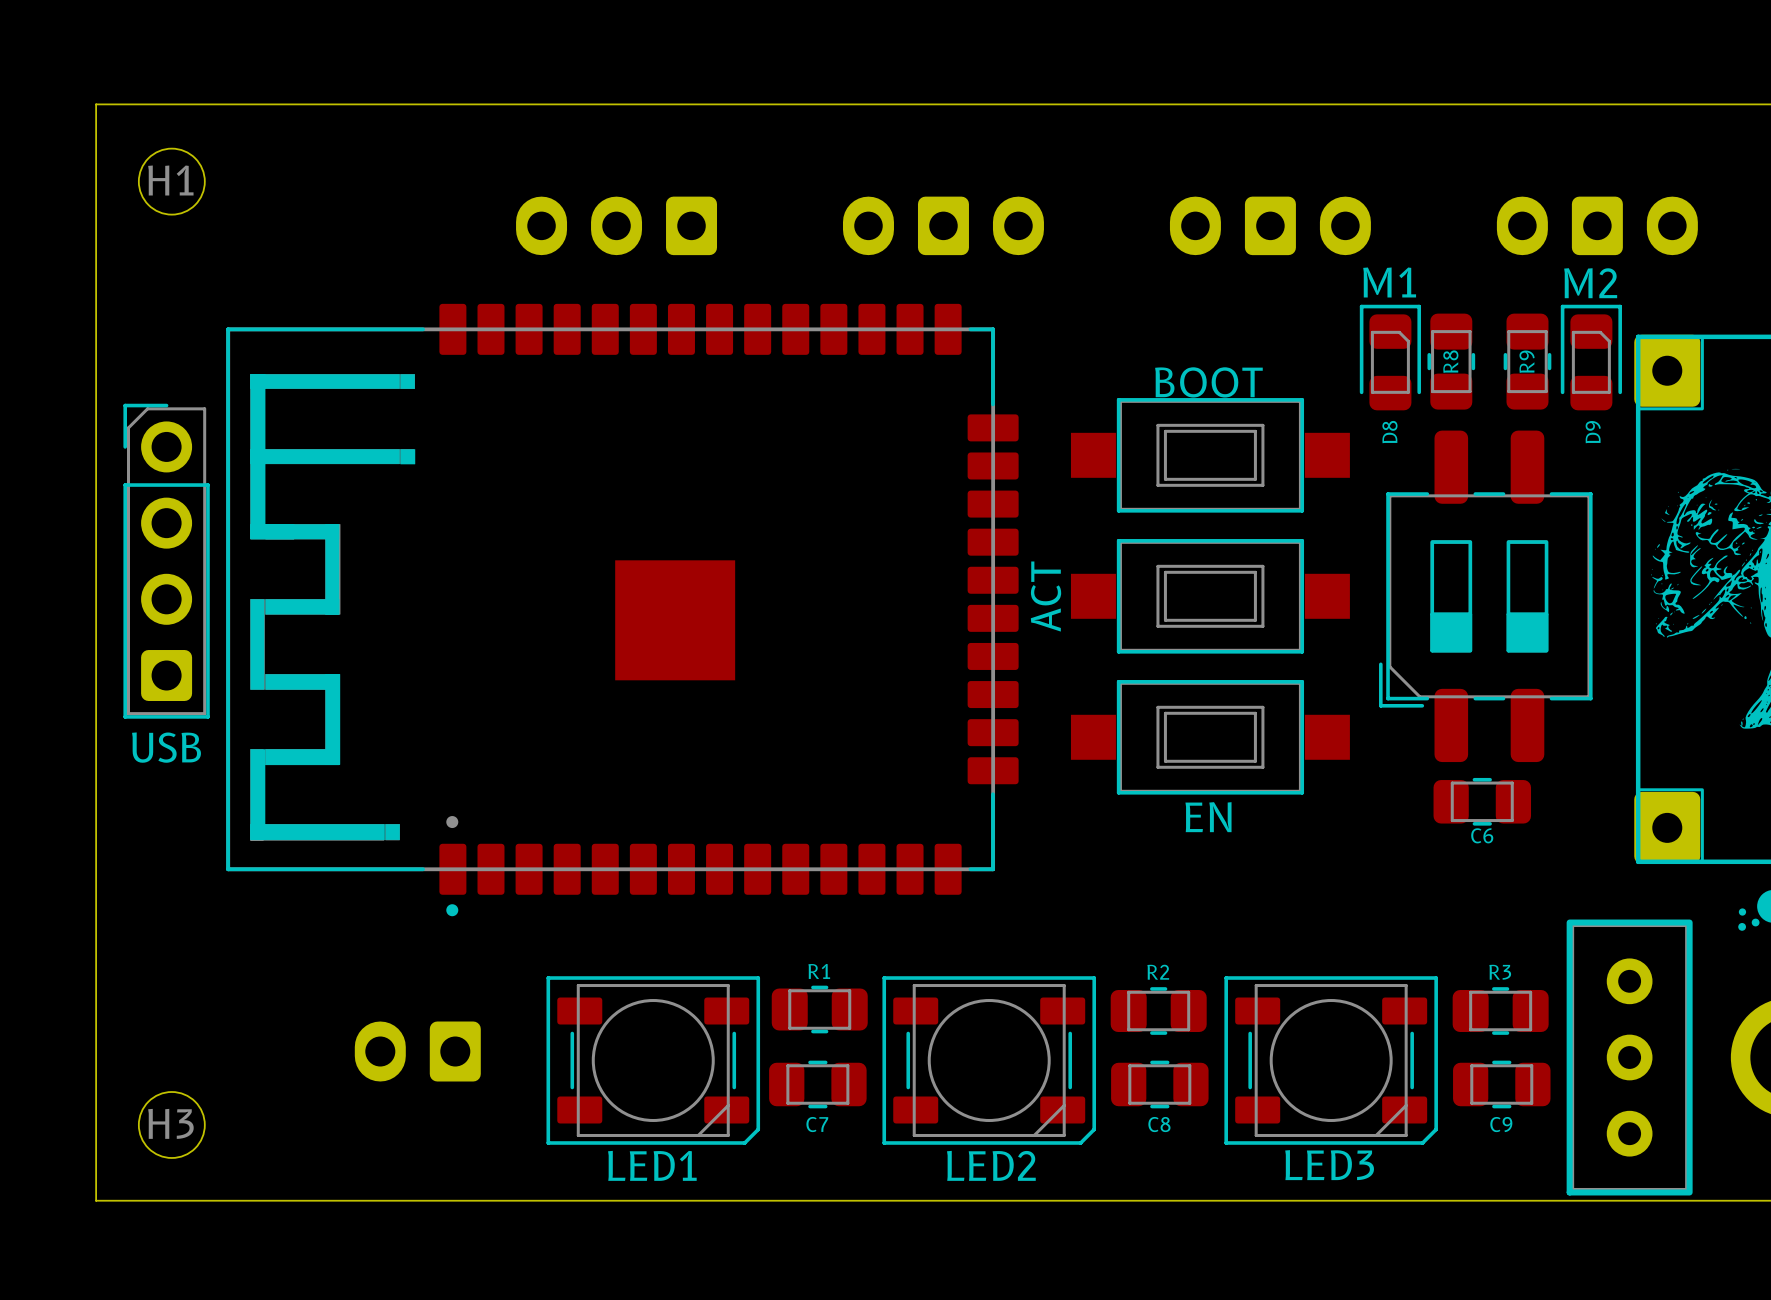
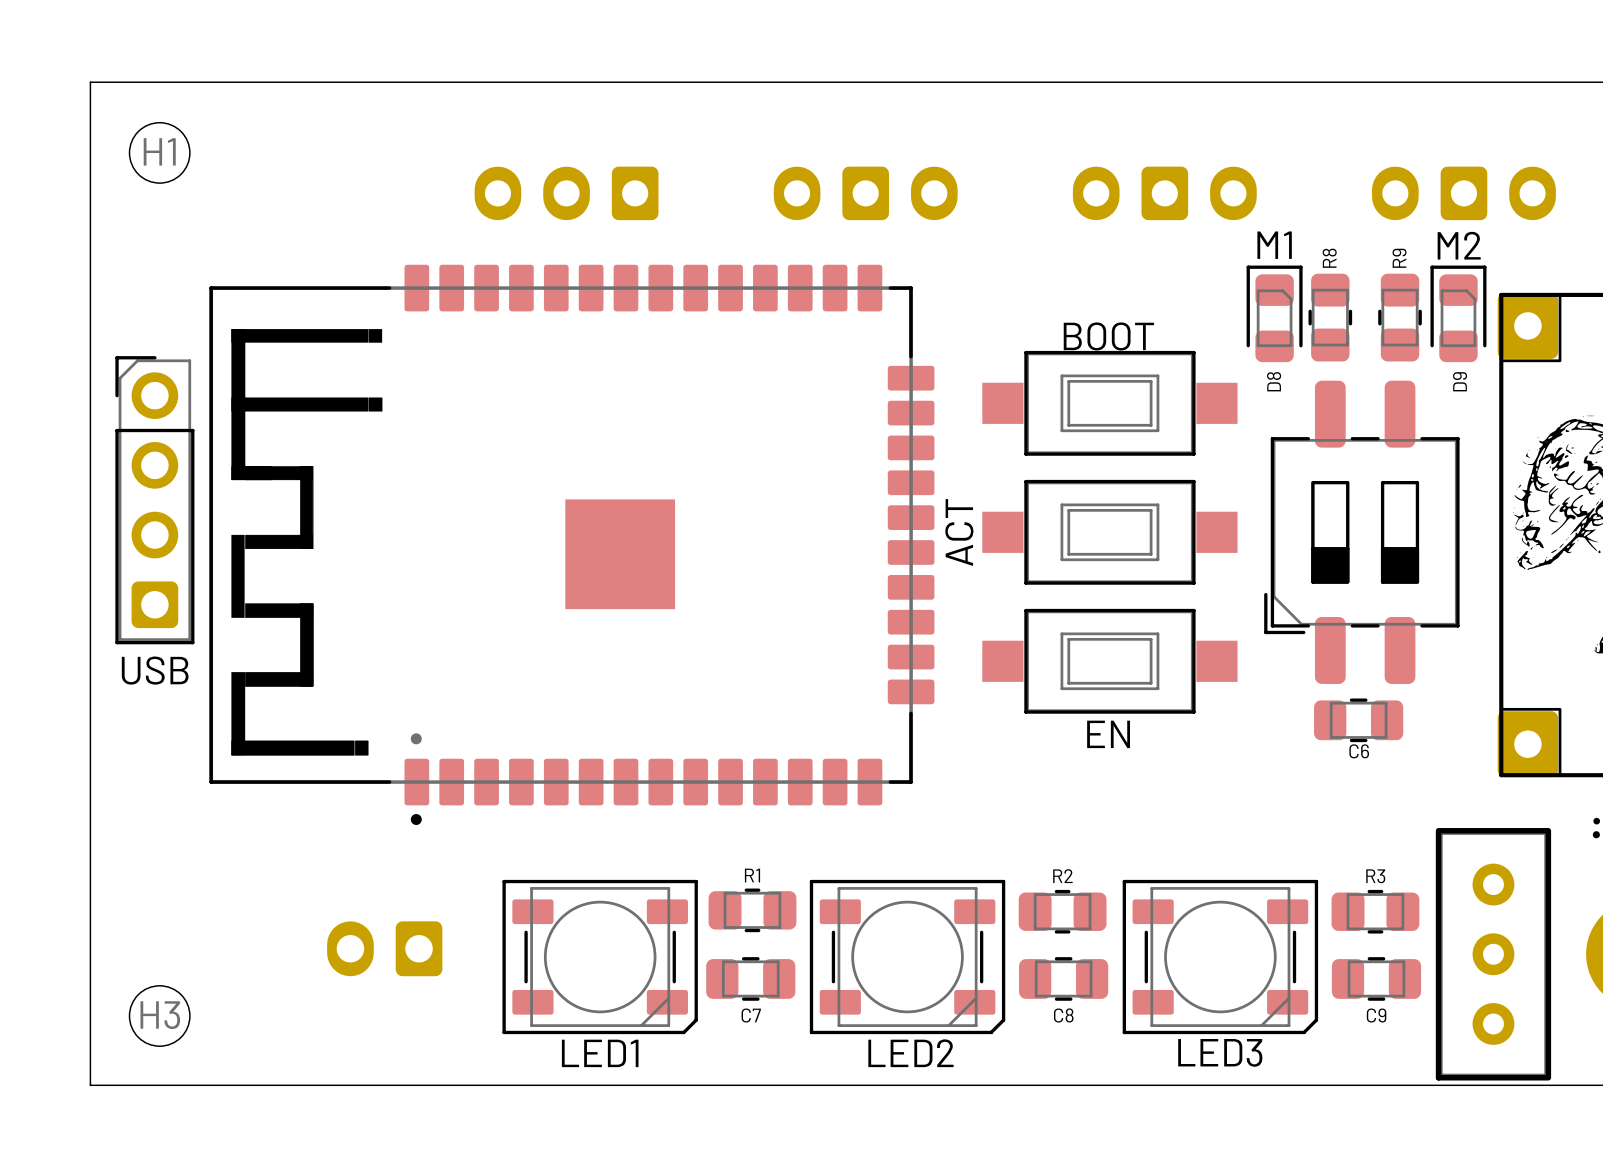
R8 name position: R8 (1450, 361) -> R8 (1329, 258)
R9 name position: R9 (1527, 361) -> R9 (1399, 258)

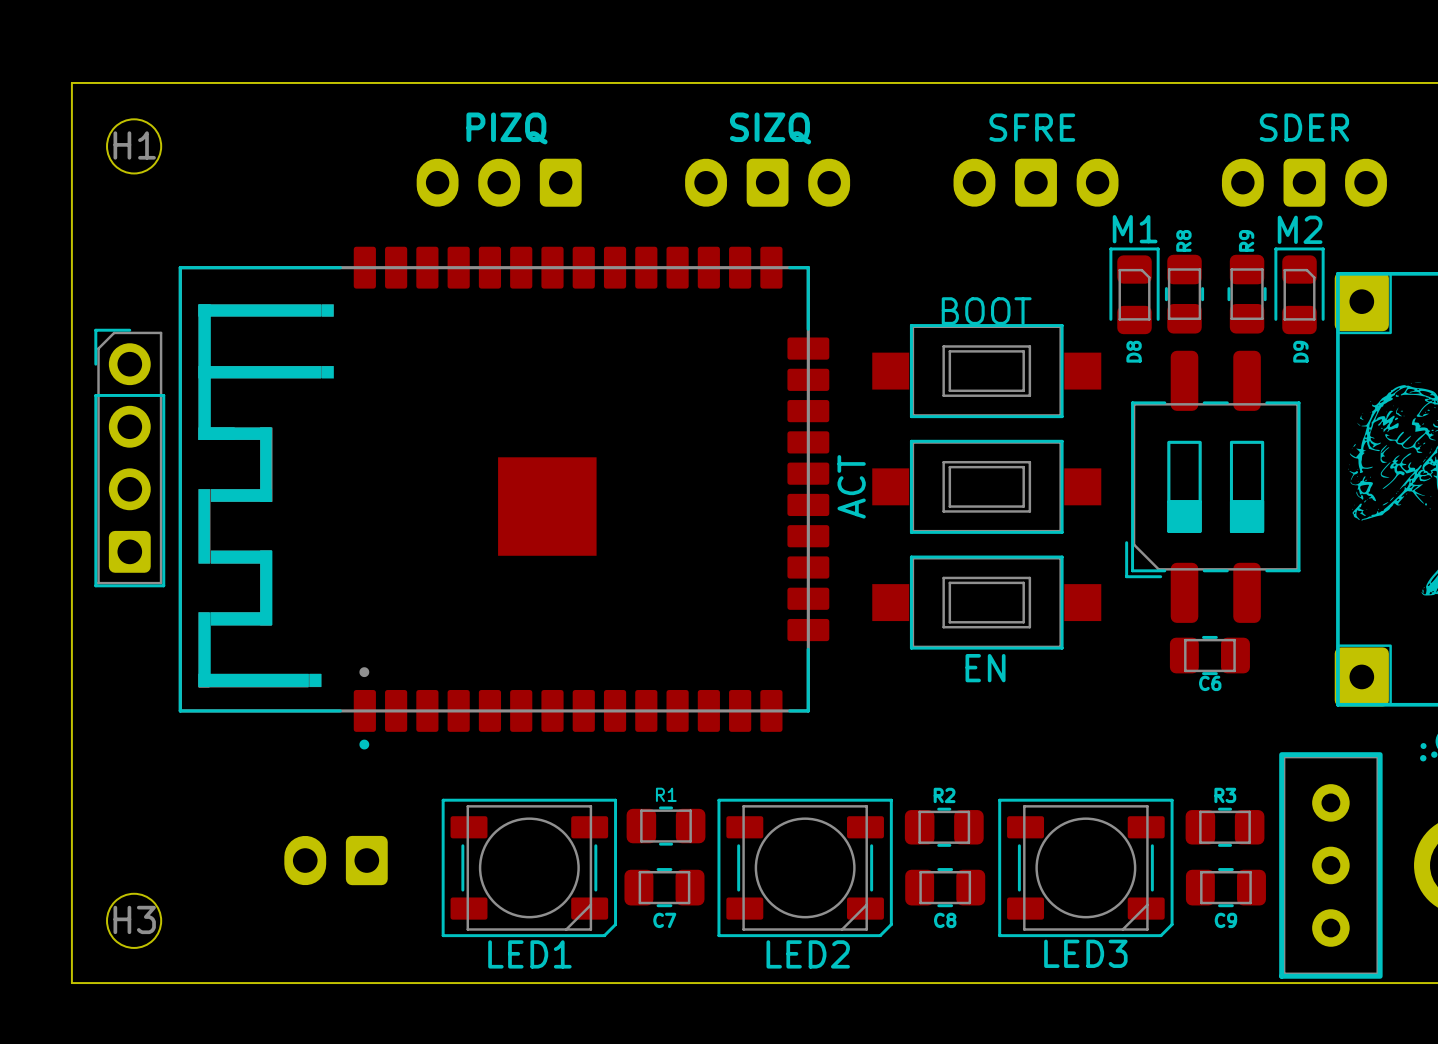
text: none -> SFRE (1032, 127)
text: none -> SDER (1304, 127)
text: none -> PIZQ (506, 128)
text: none -> SIZQ (770, 128)
part value: USB (155, 670) -> none

